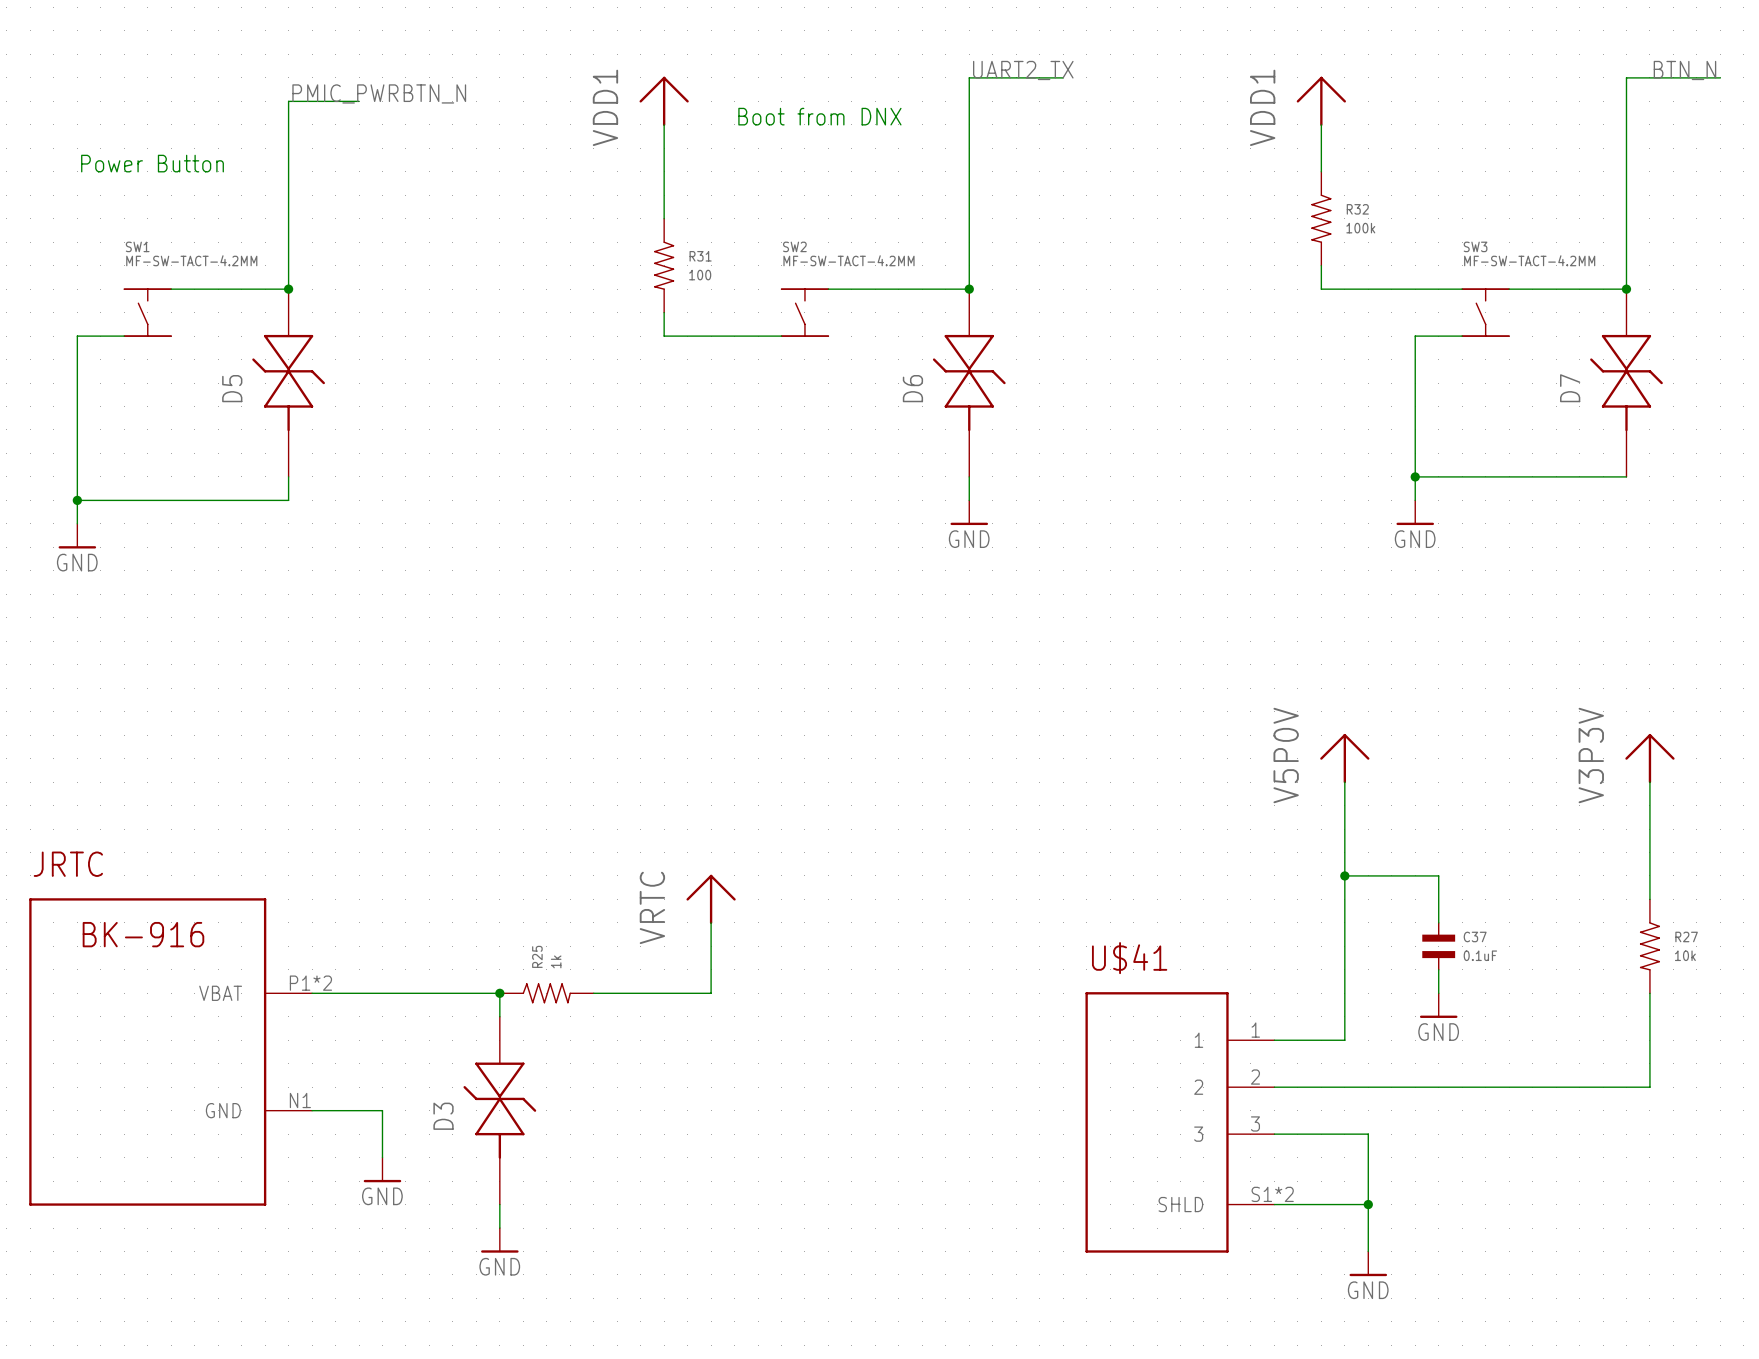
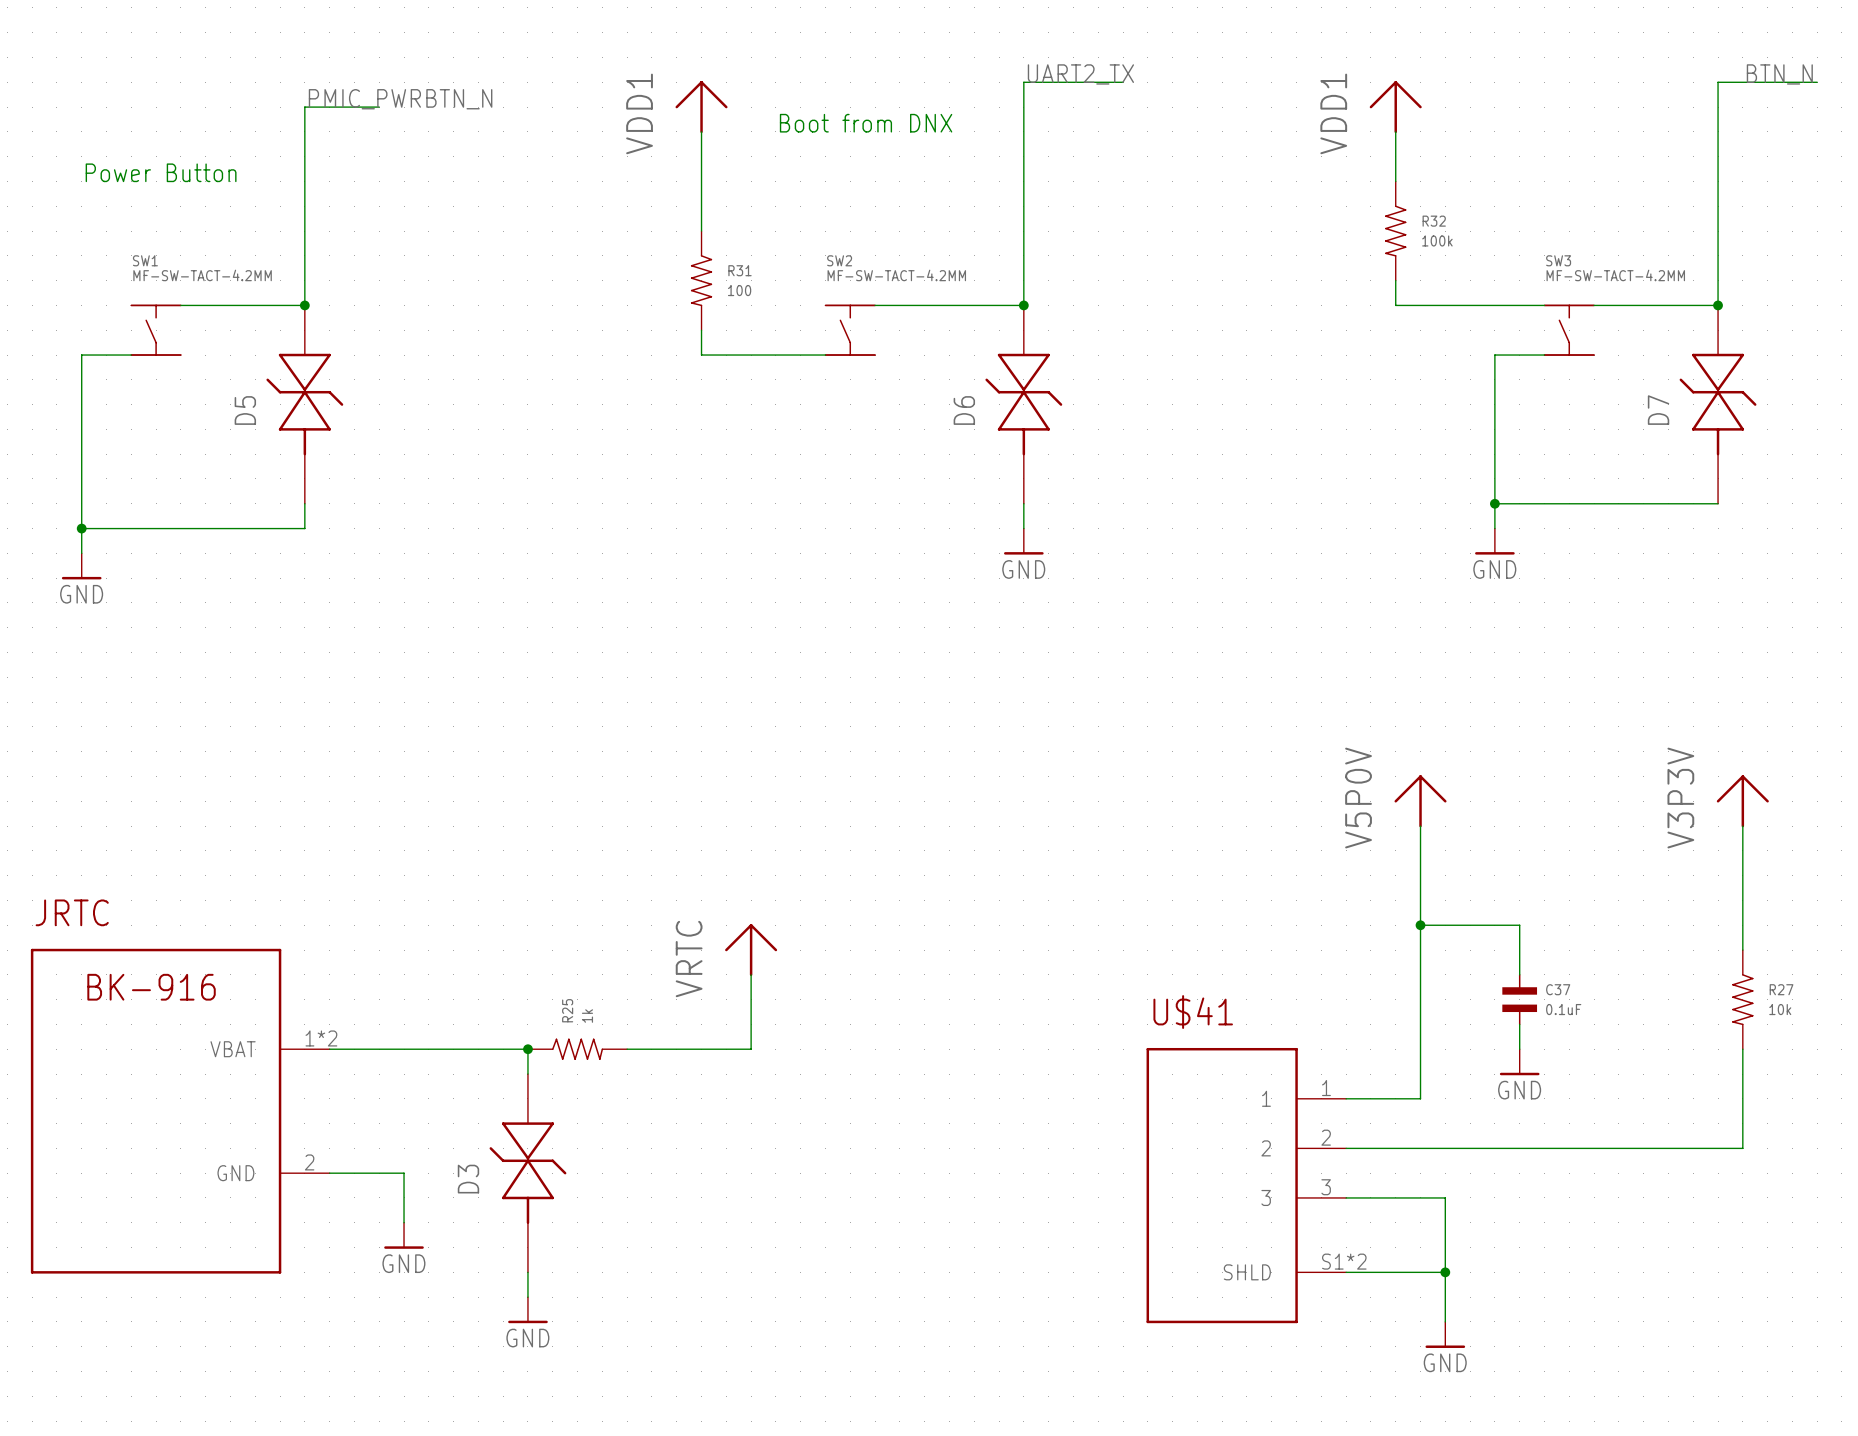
JRTC pin number: P1*2 (310, 983) -> 1*2 (321, 1038)
JRTC pin number: N1 (300, 1100) -> 2 (309, 1162)

